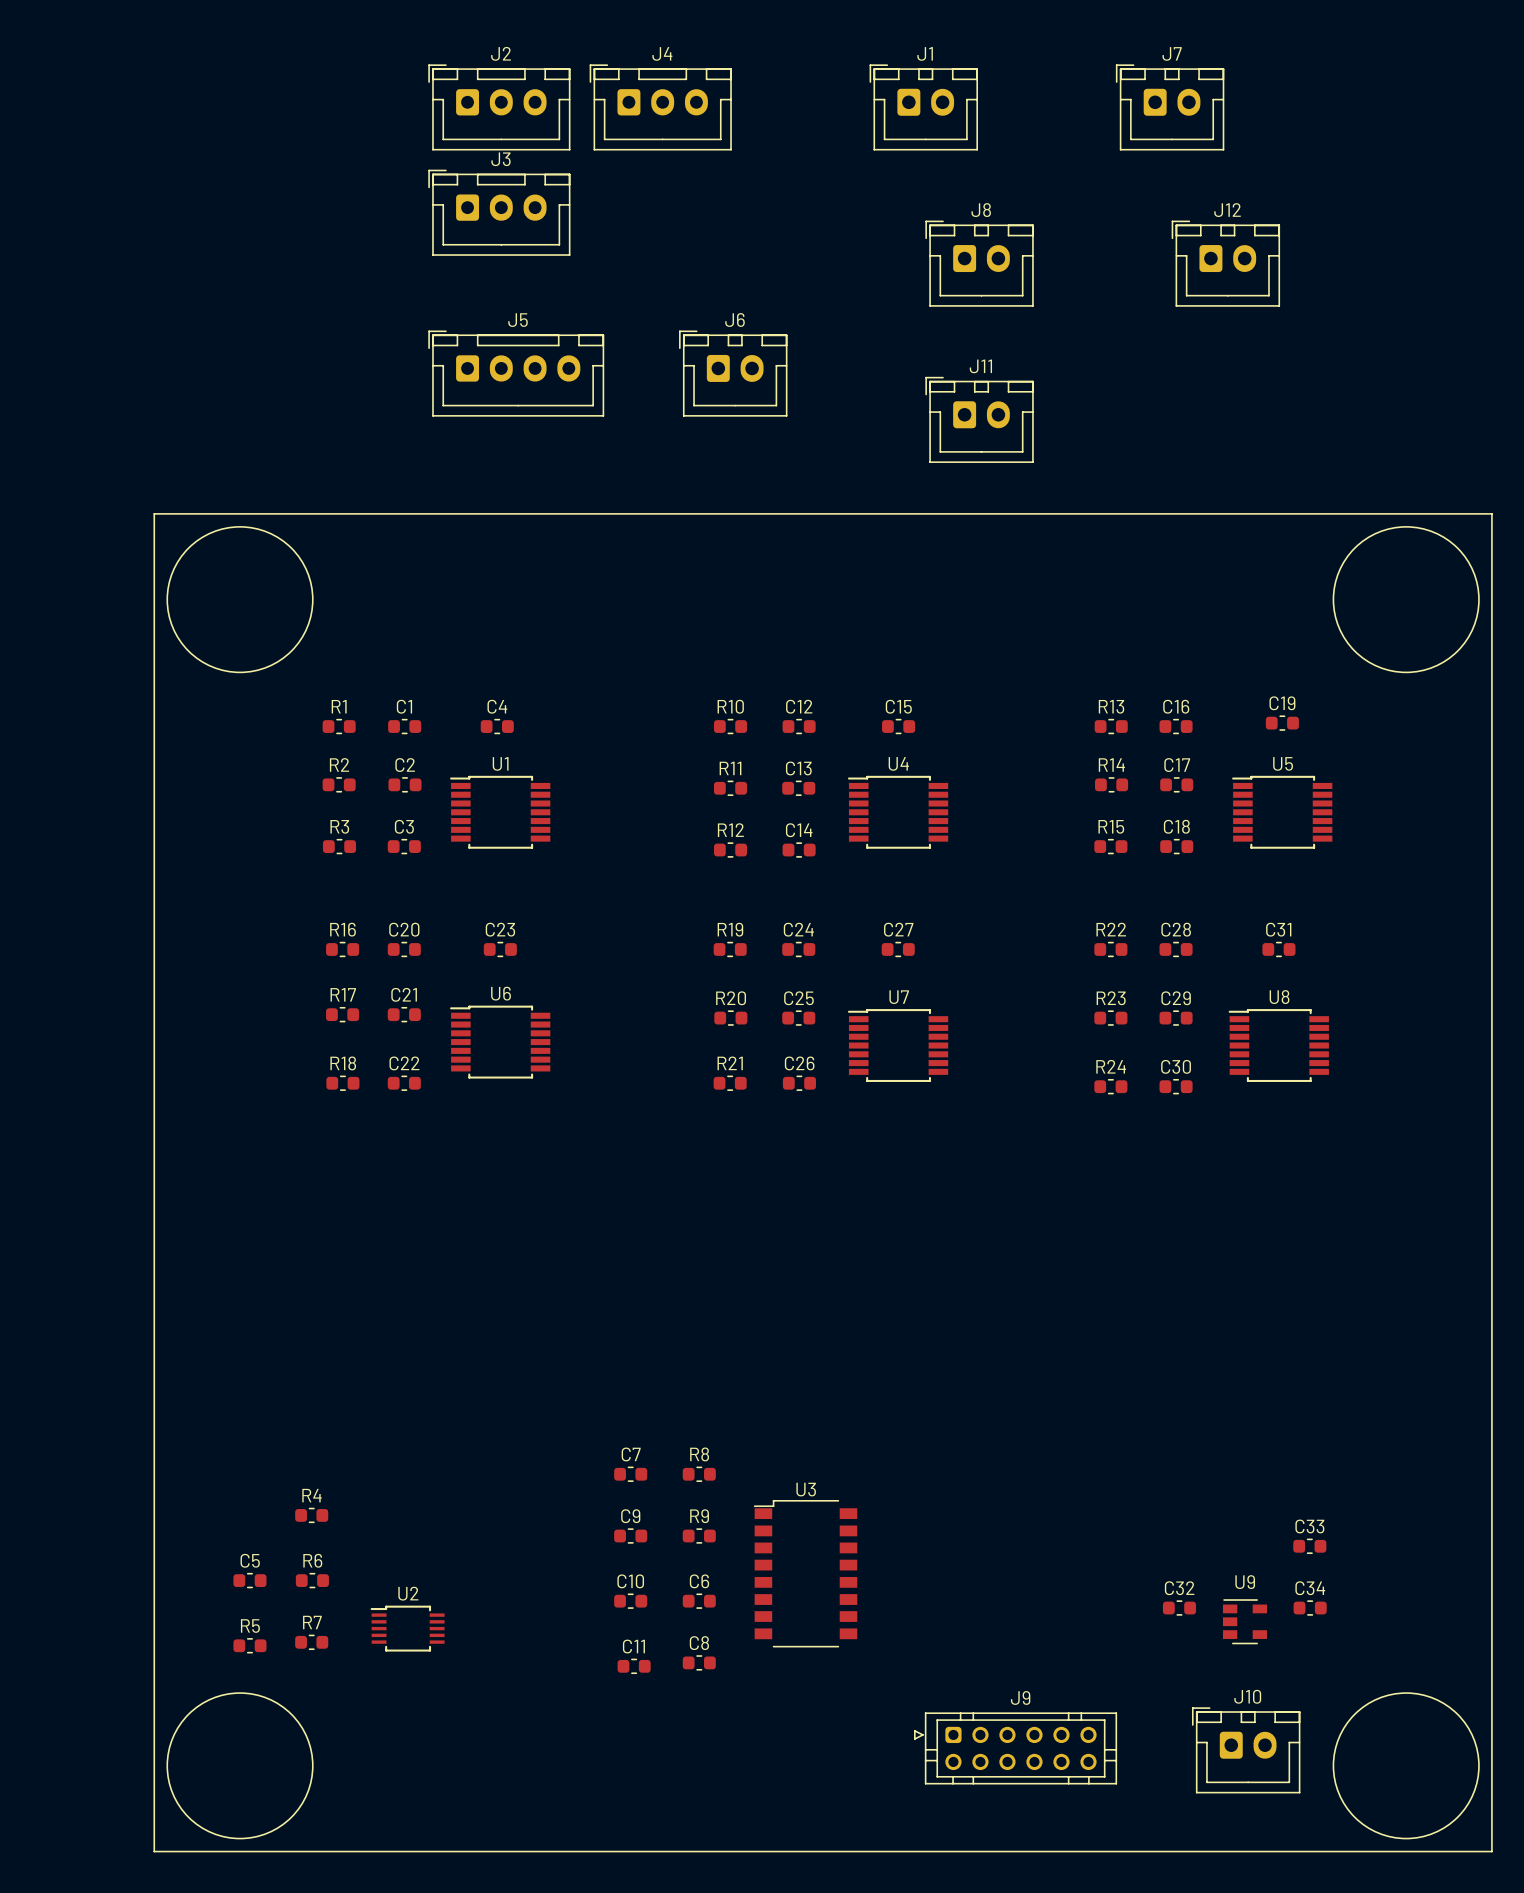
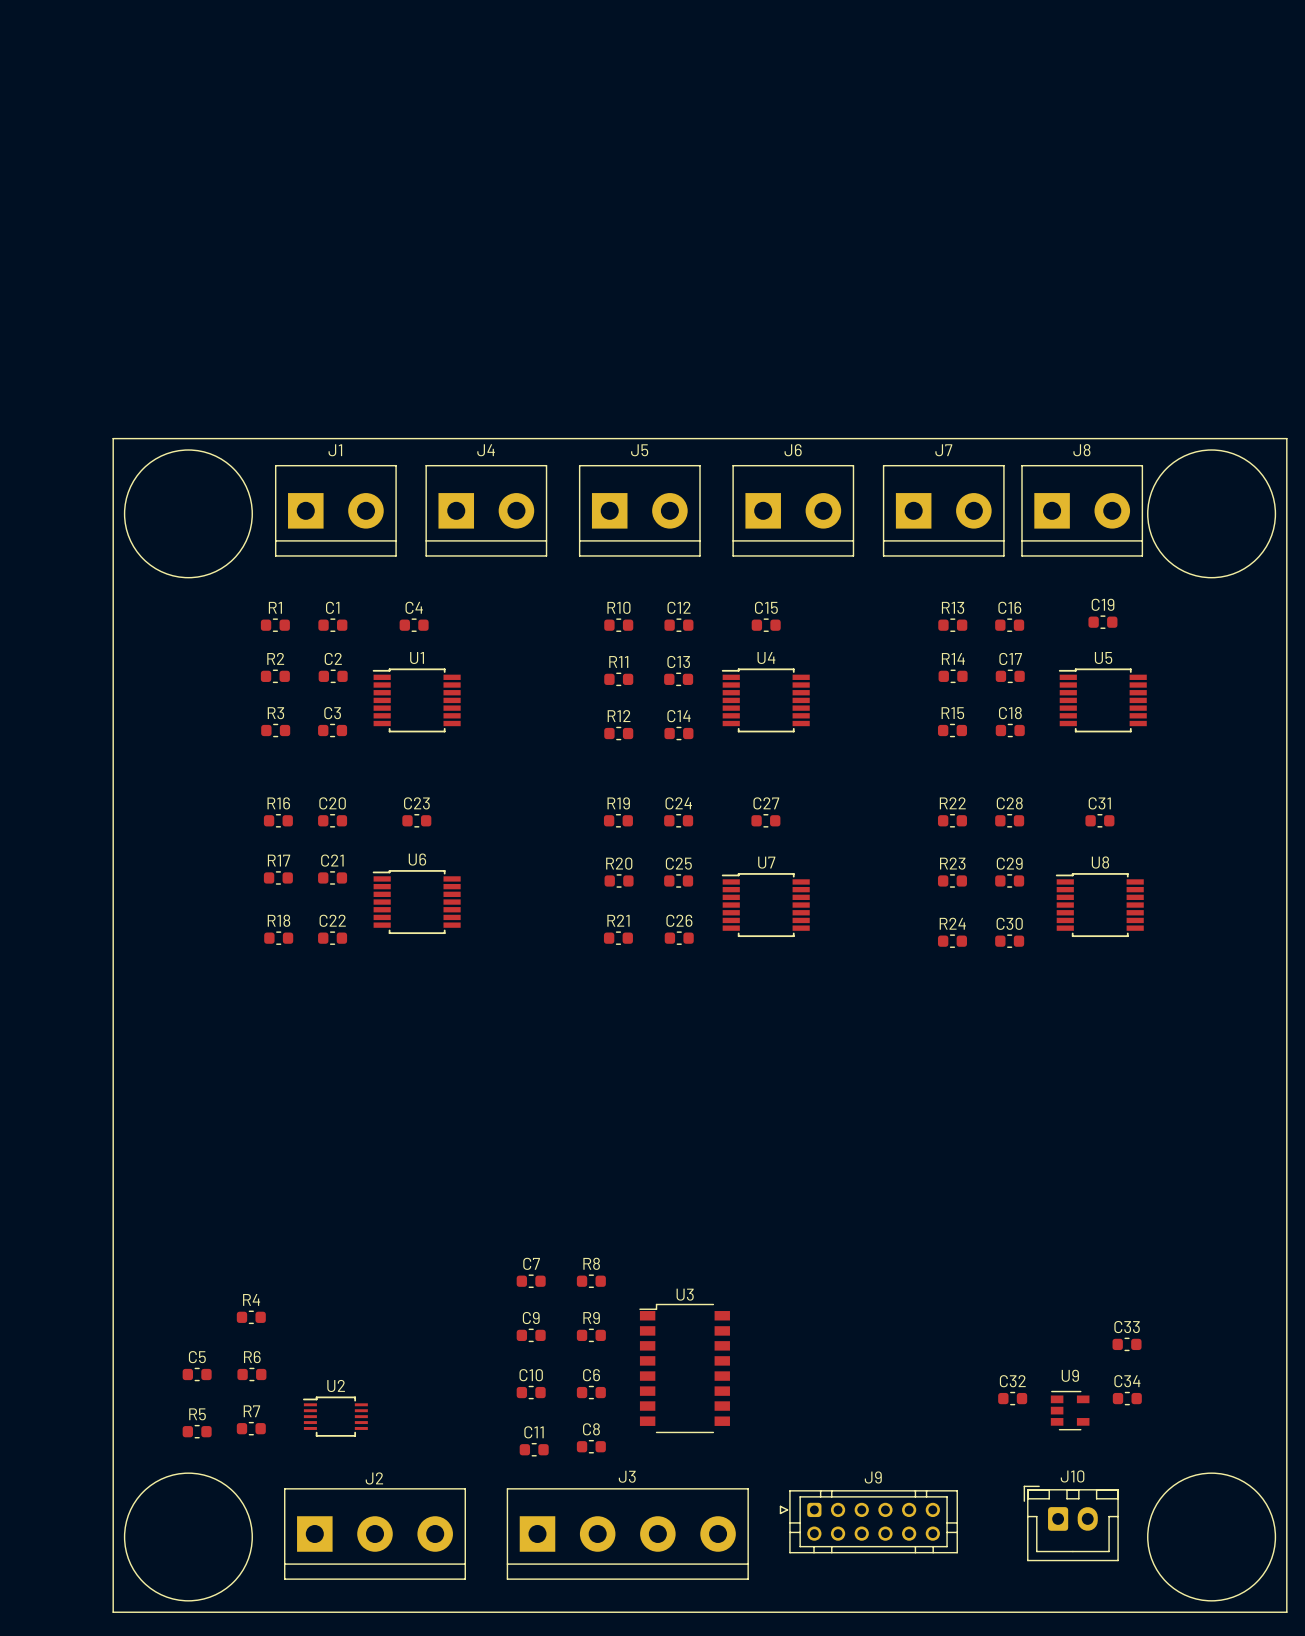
J2 footprint: [428, 64, 571, 151] -> [284, 1488, 466, 1580]
J4 footprint: [589, 64, 732, 151] -> [425, 464, 548, 557]
J1 footprint: [869, 64, 979, 151] -> [274, 464, 397, 557]
J7 footprint: [1115, 64, 1225, 151] -> [882, 464, 1005, 557]
J3 footprint: [428, 169, 571, 256] -> [506, 1488, 749, 1580]
J8 footprint: [925, 220, 1034, 307] -> [1021, 464, 1144, 557]
J12: (1225, 263) -> none
J5 footprint: [428, 330, 605, 417] -> [578, 464, 701, 557]
J6 footprint: [679, 330, 788, 417] -> [732, 464, 855, 557]
J11: (979, 419) -> none

